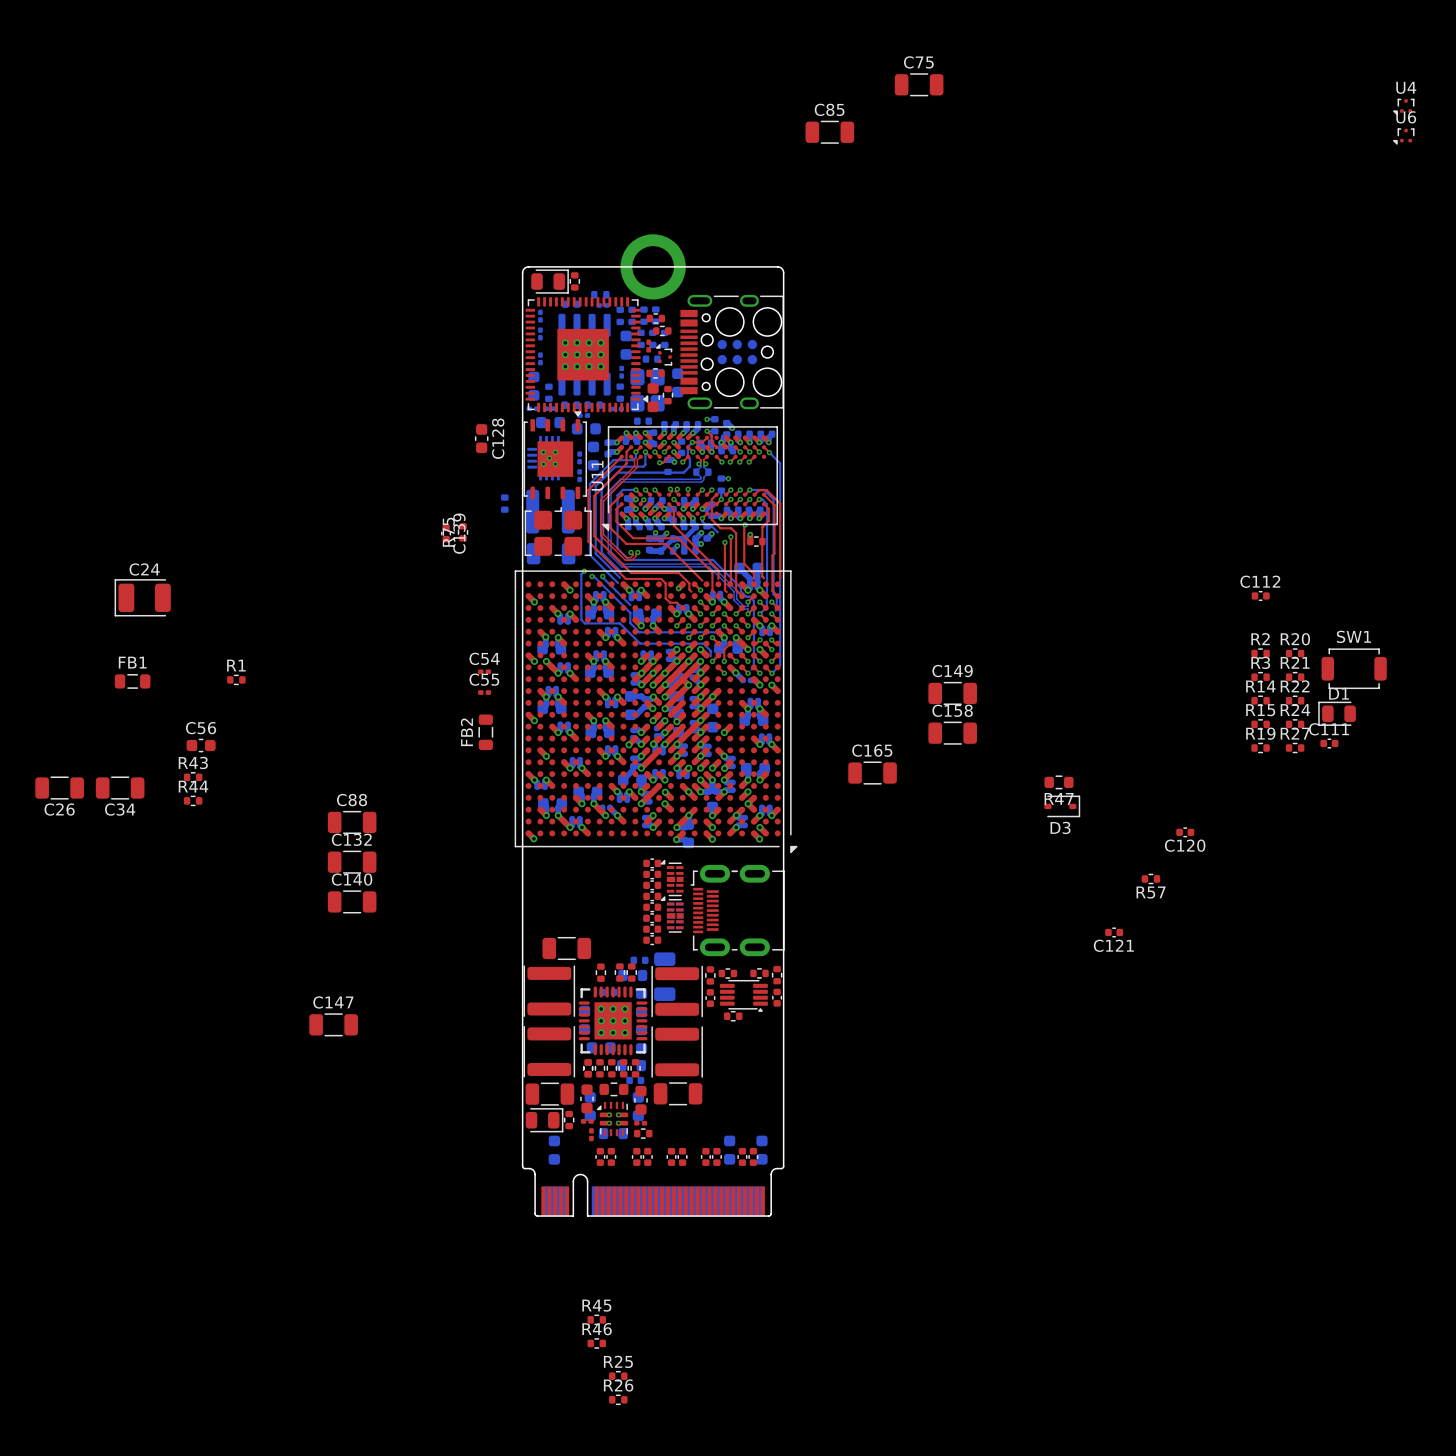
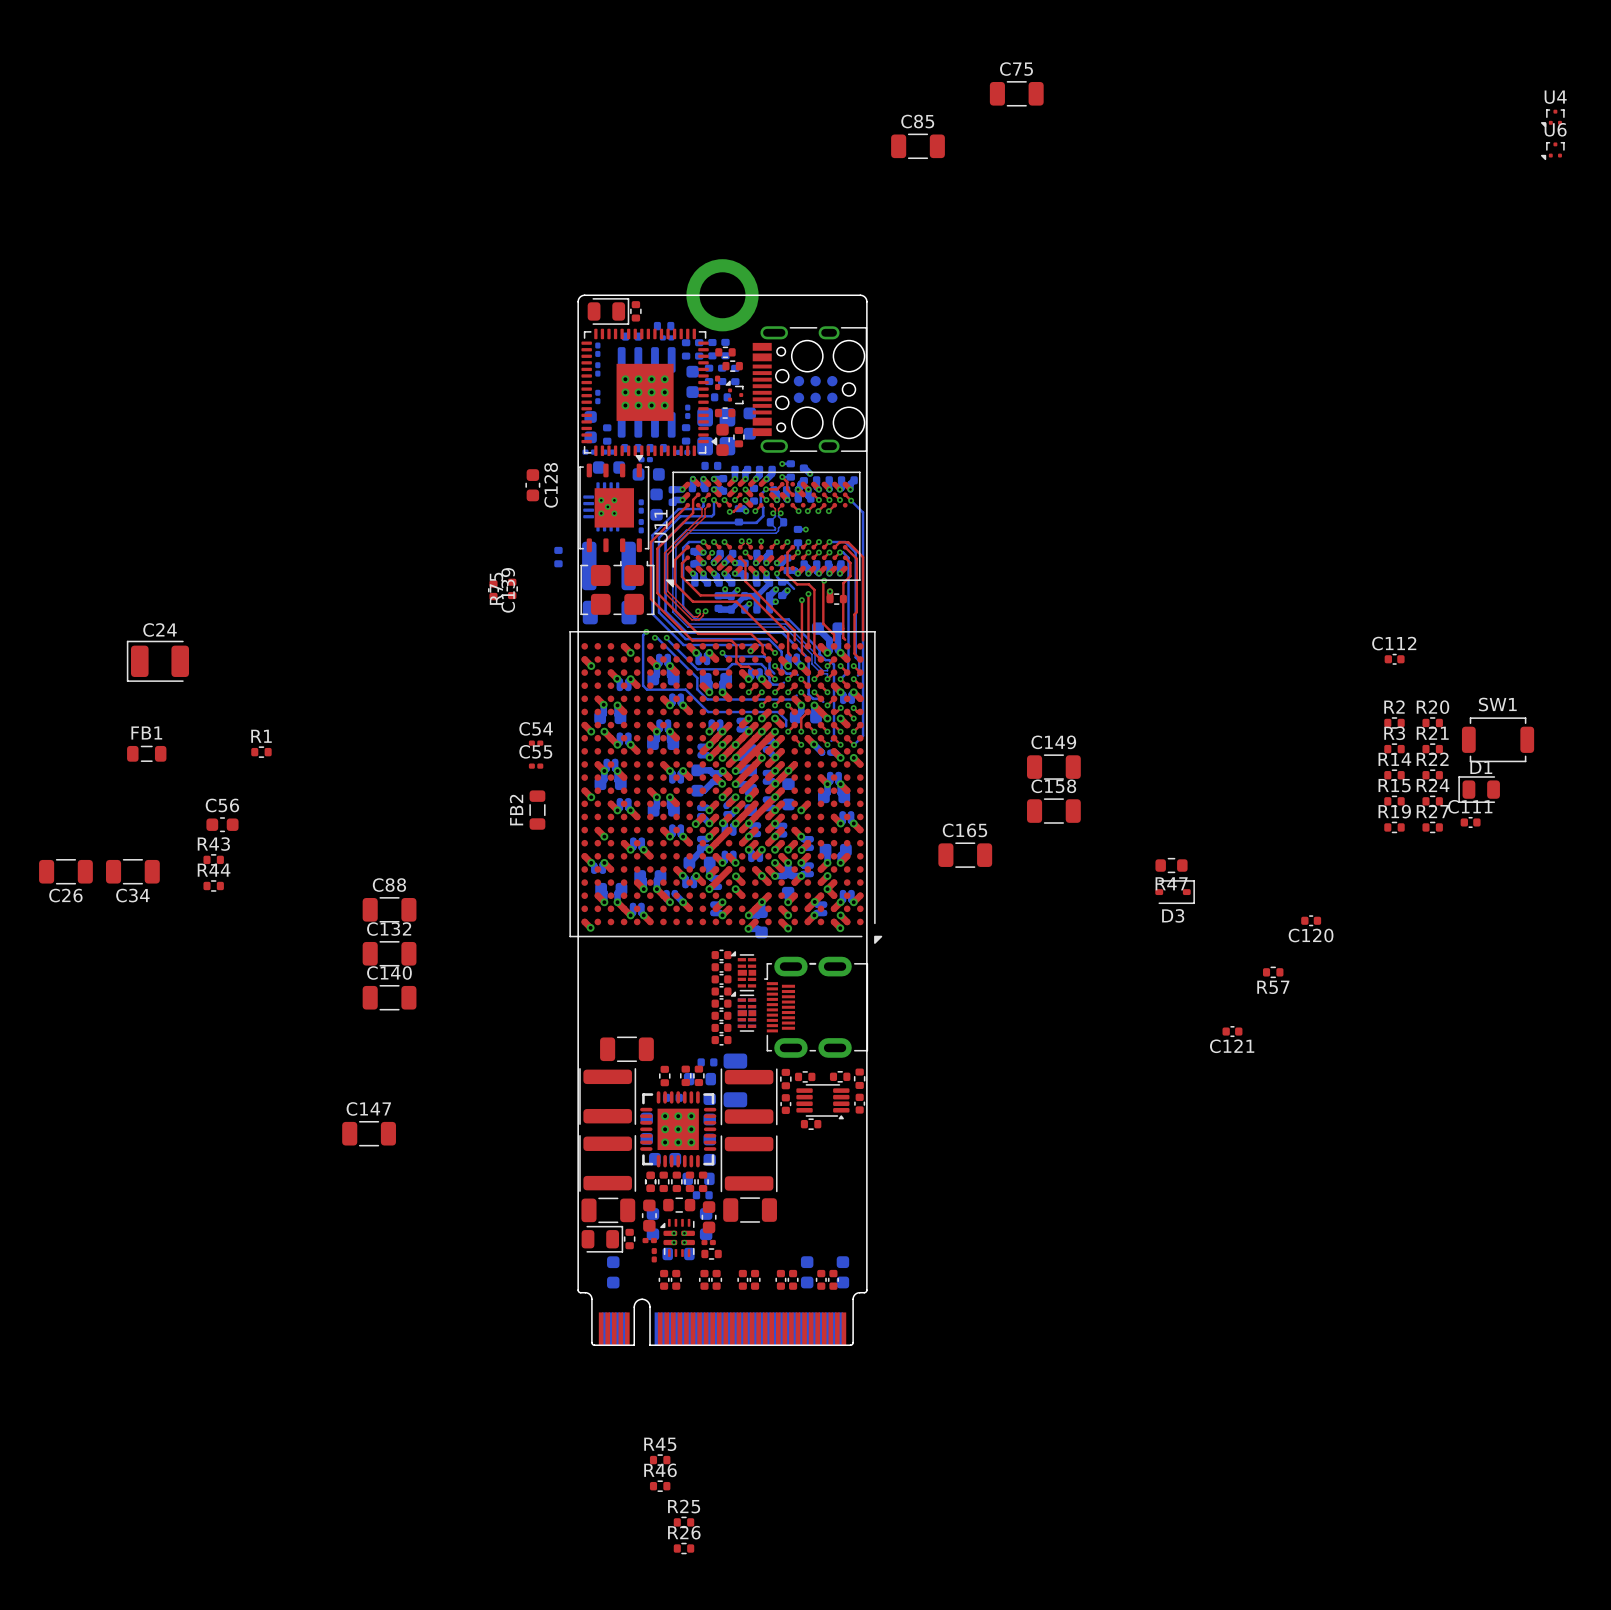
bottom track: none -> (686, 632) (782, 632) (808, 658) (808, 694) (813, 698) (820, 698) (823, 701)
bottom track: none -> (685, 639) (769, 639) (781, 651) (781, 668) (786, 673) (797, 674)
bottom track: none -> (683, 645) (767, 645) (771, 648)
bottom track: none -> (722, 652) (726, 656) (764, 656) (769, 661) (769, 668) (774, 673)
via: none -> (722, 652)
bottom track: none -> (697, 669) (727, 669) (732, 664) (761, 664) (765, 668) (765, 673) (772, 684) (781, 684) (783, 682)

